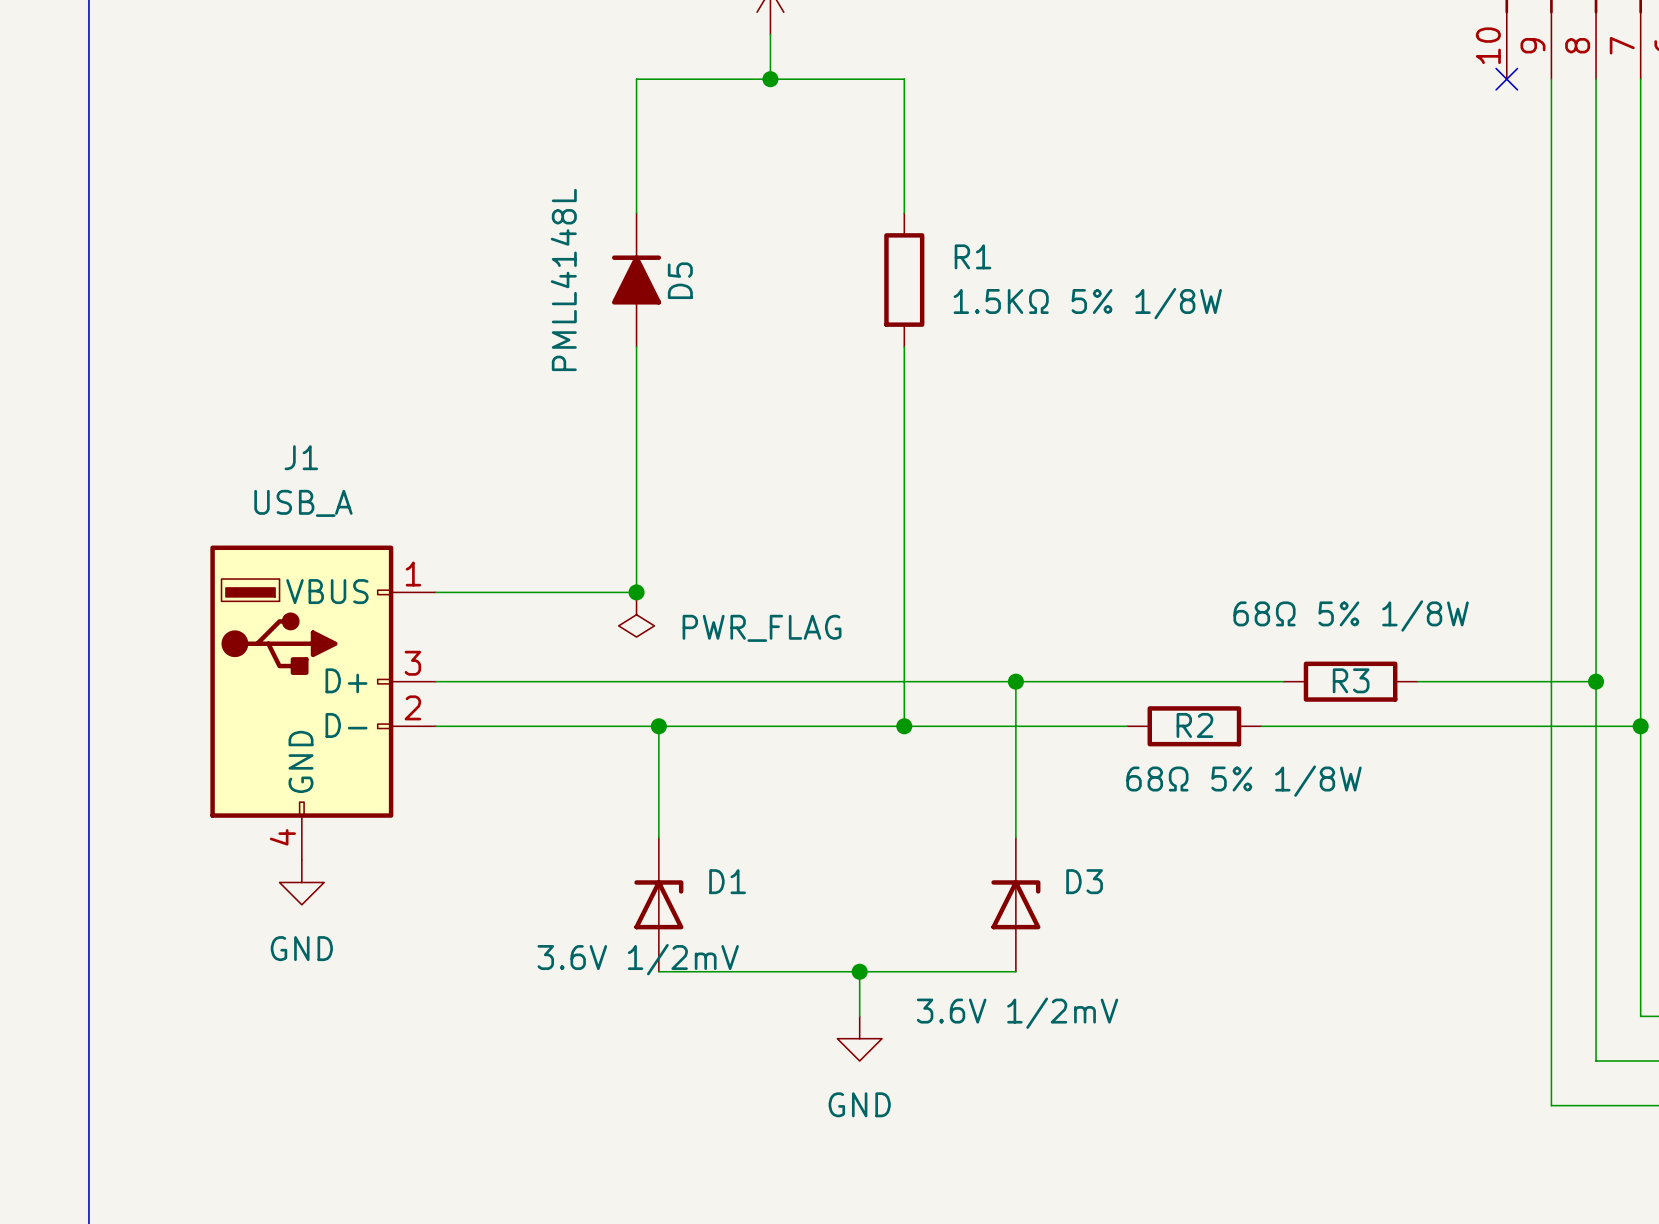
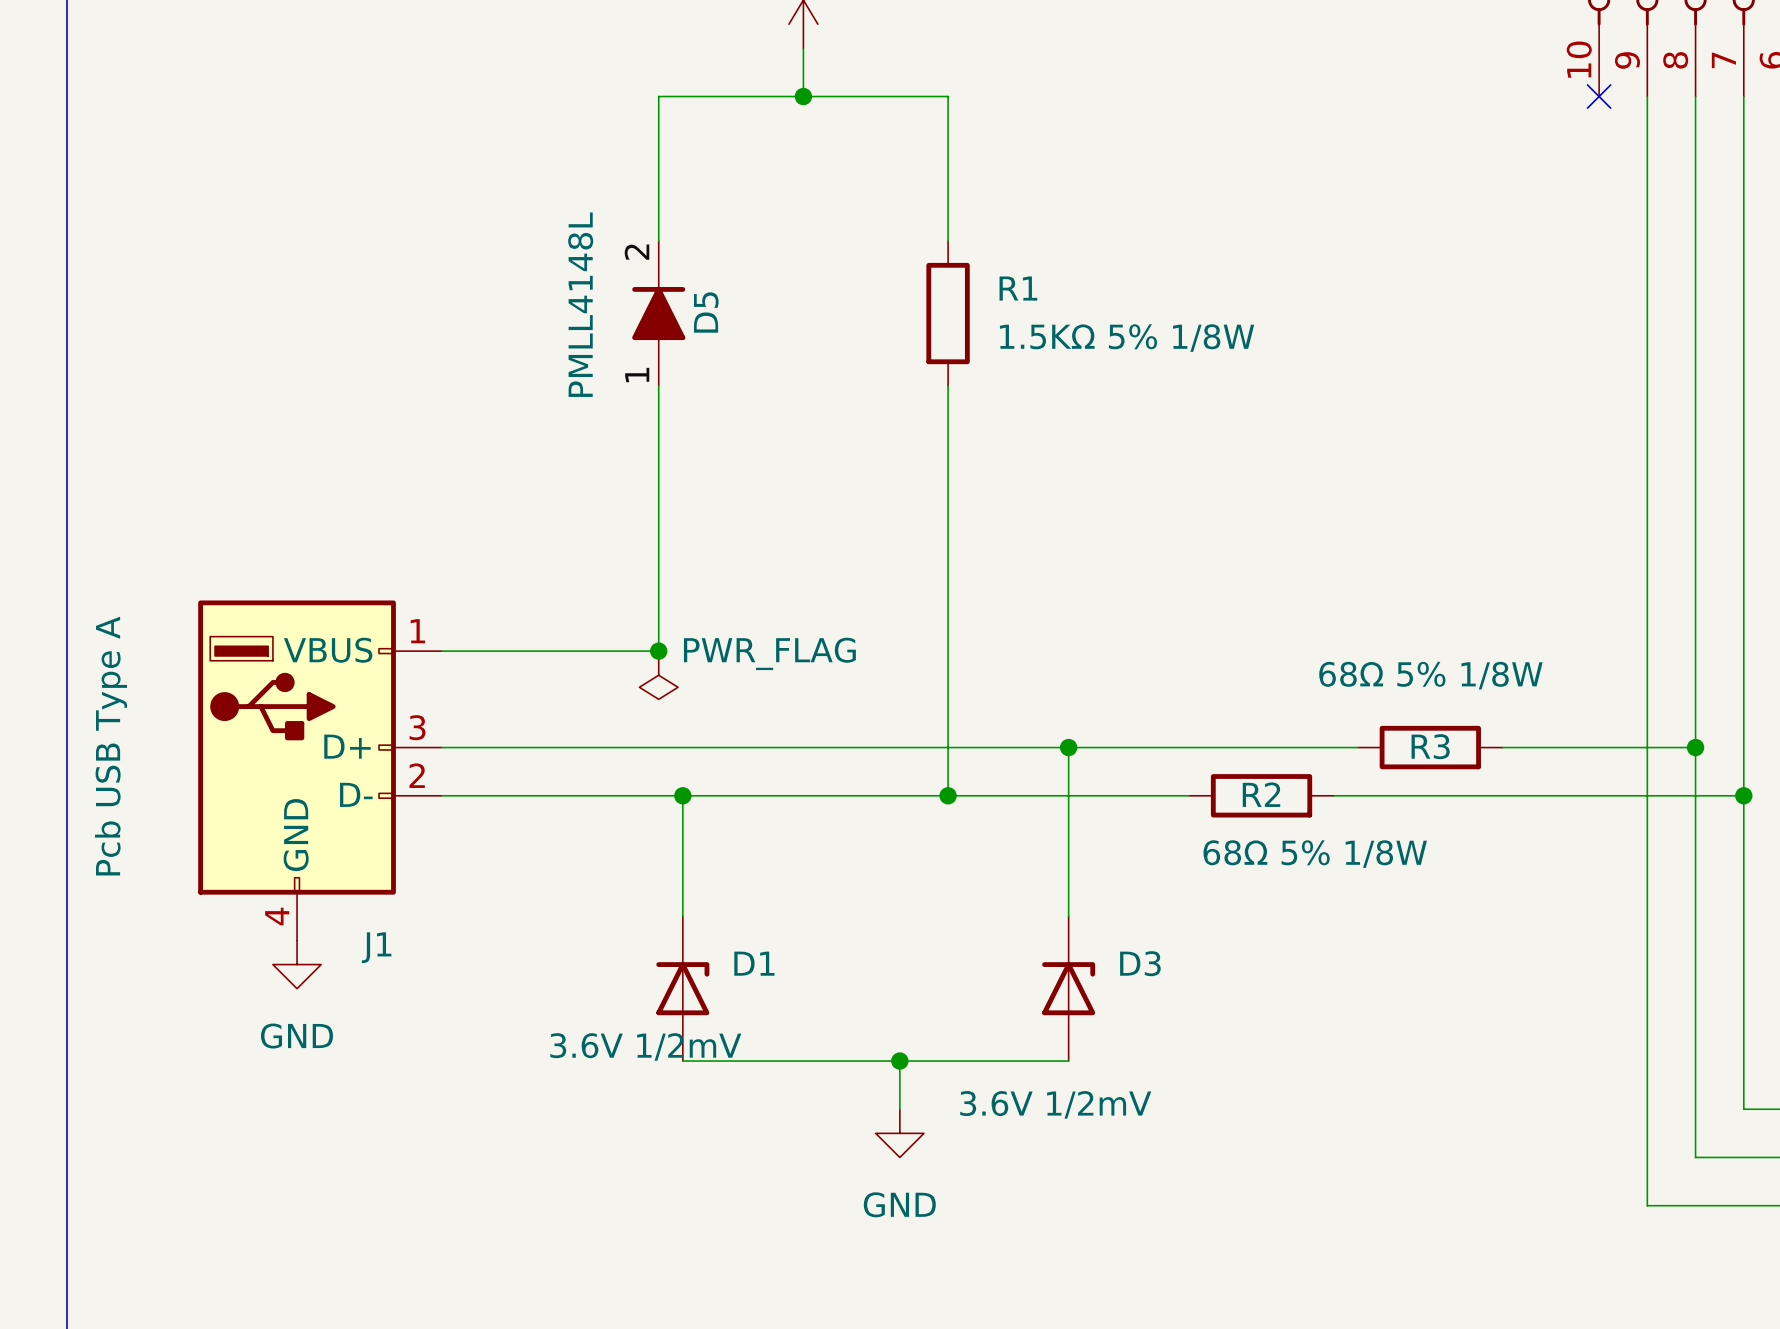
label: none -> 2 (636, 252)
label: none -> 1 (637, 375)
J1 name position: J1 (301, 457) -> J1 (376, 947)
J1 value: USB_A (303, 503) -> Pcb USB Type A (110, 746)
power symbol text position: PWR_FLAG (762, 628) -> PWR_FLAG (769, 653)

